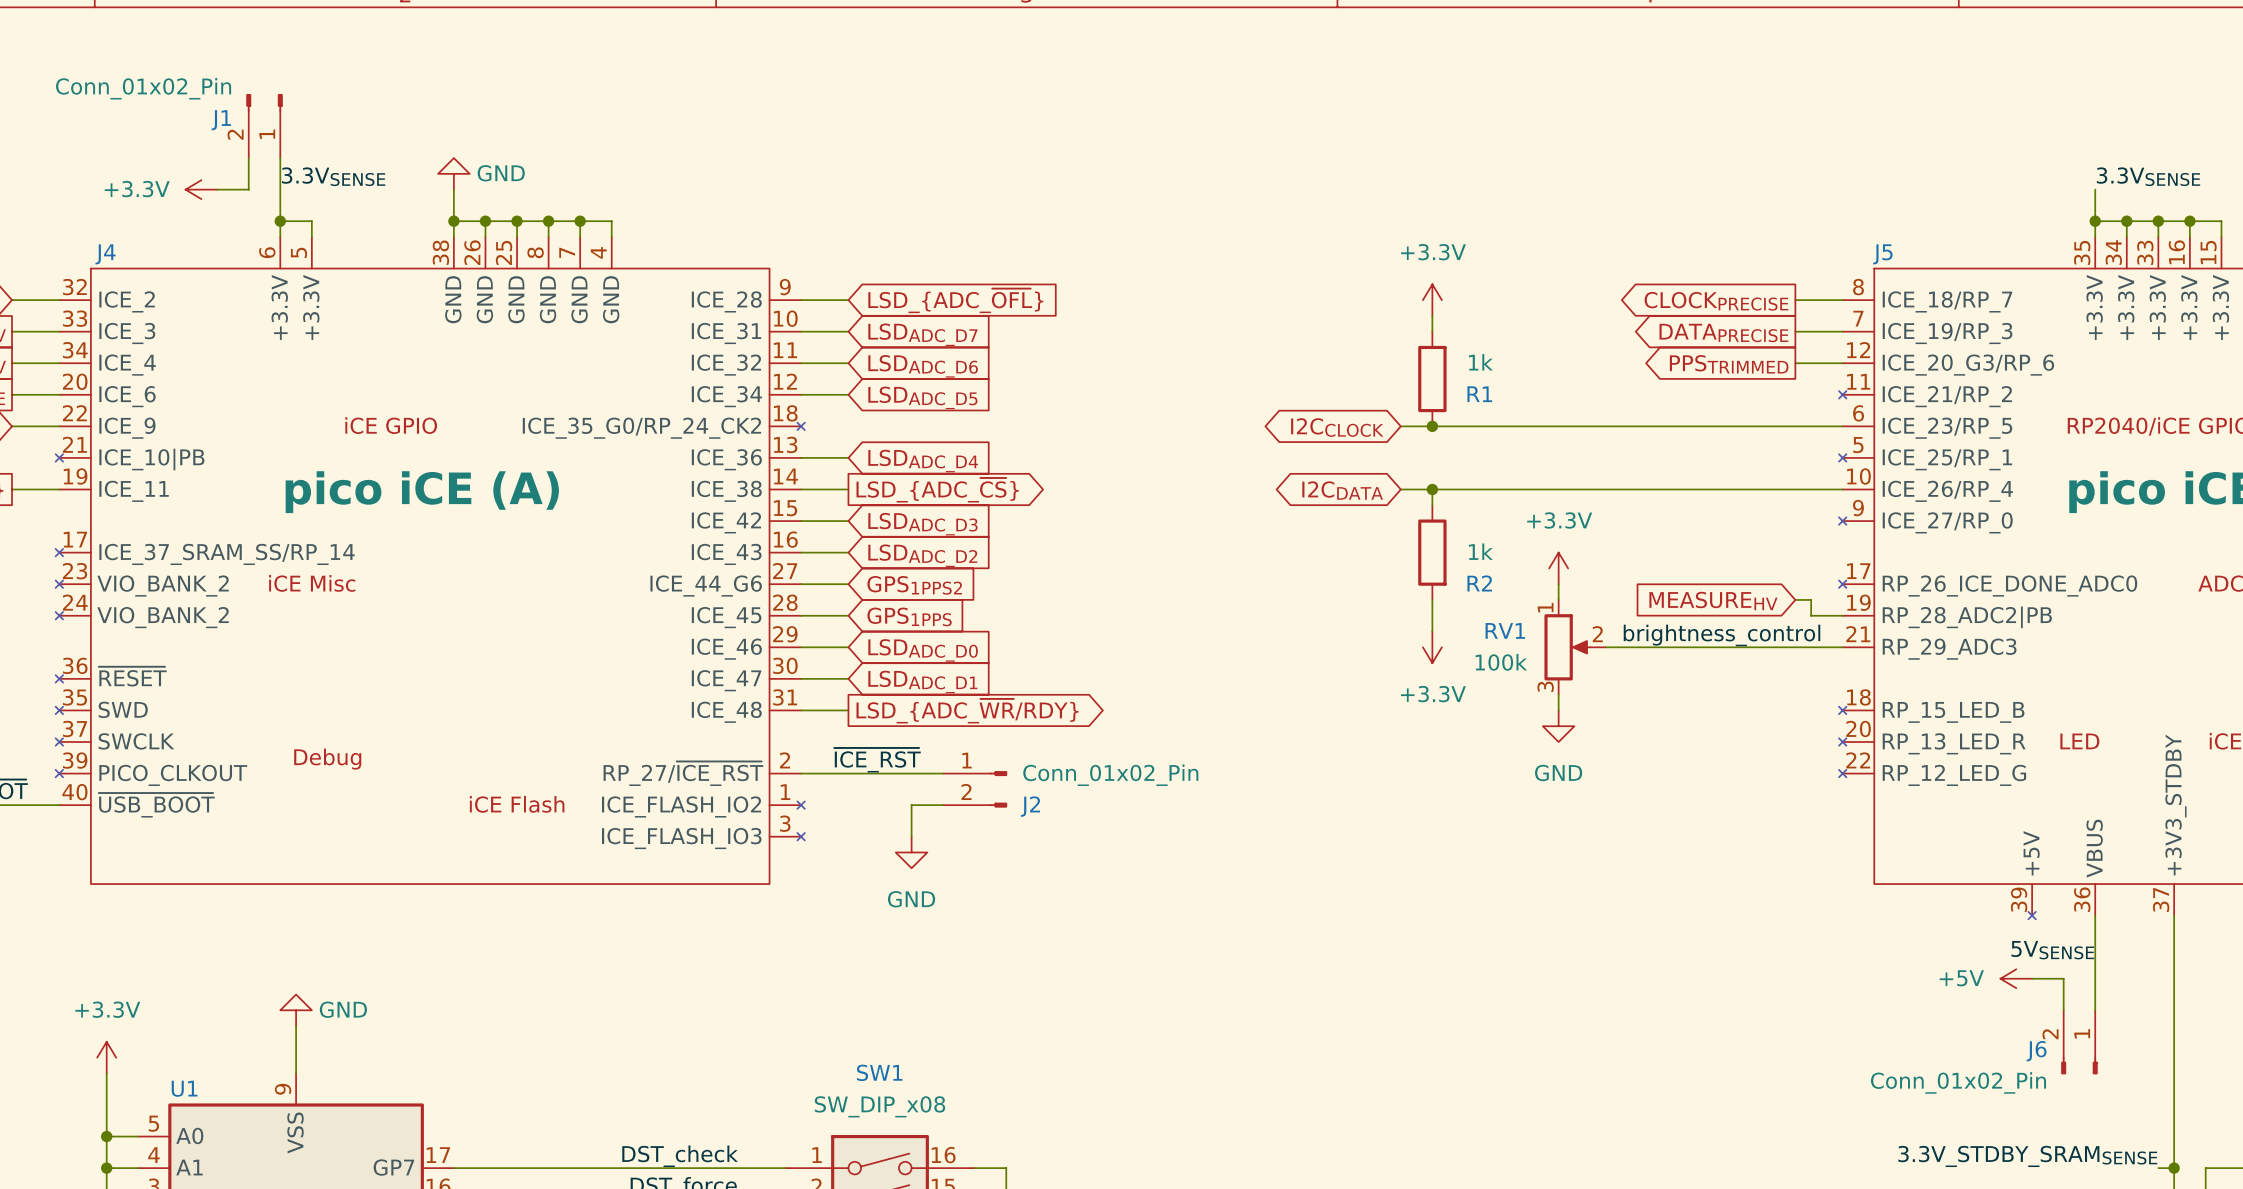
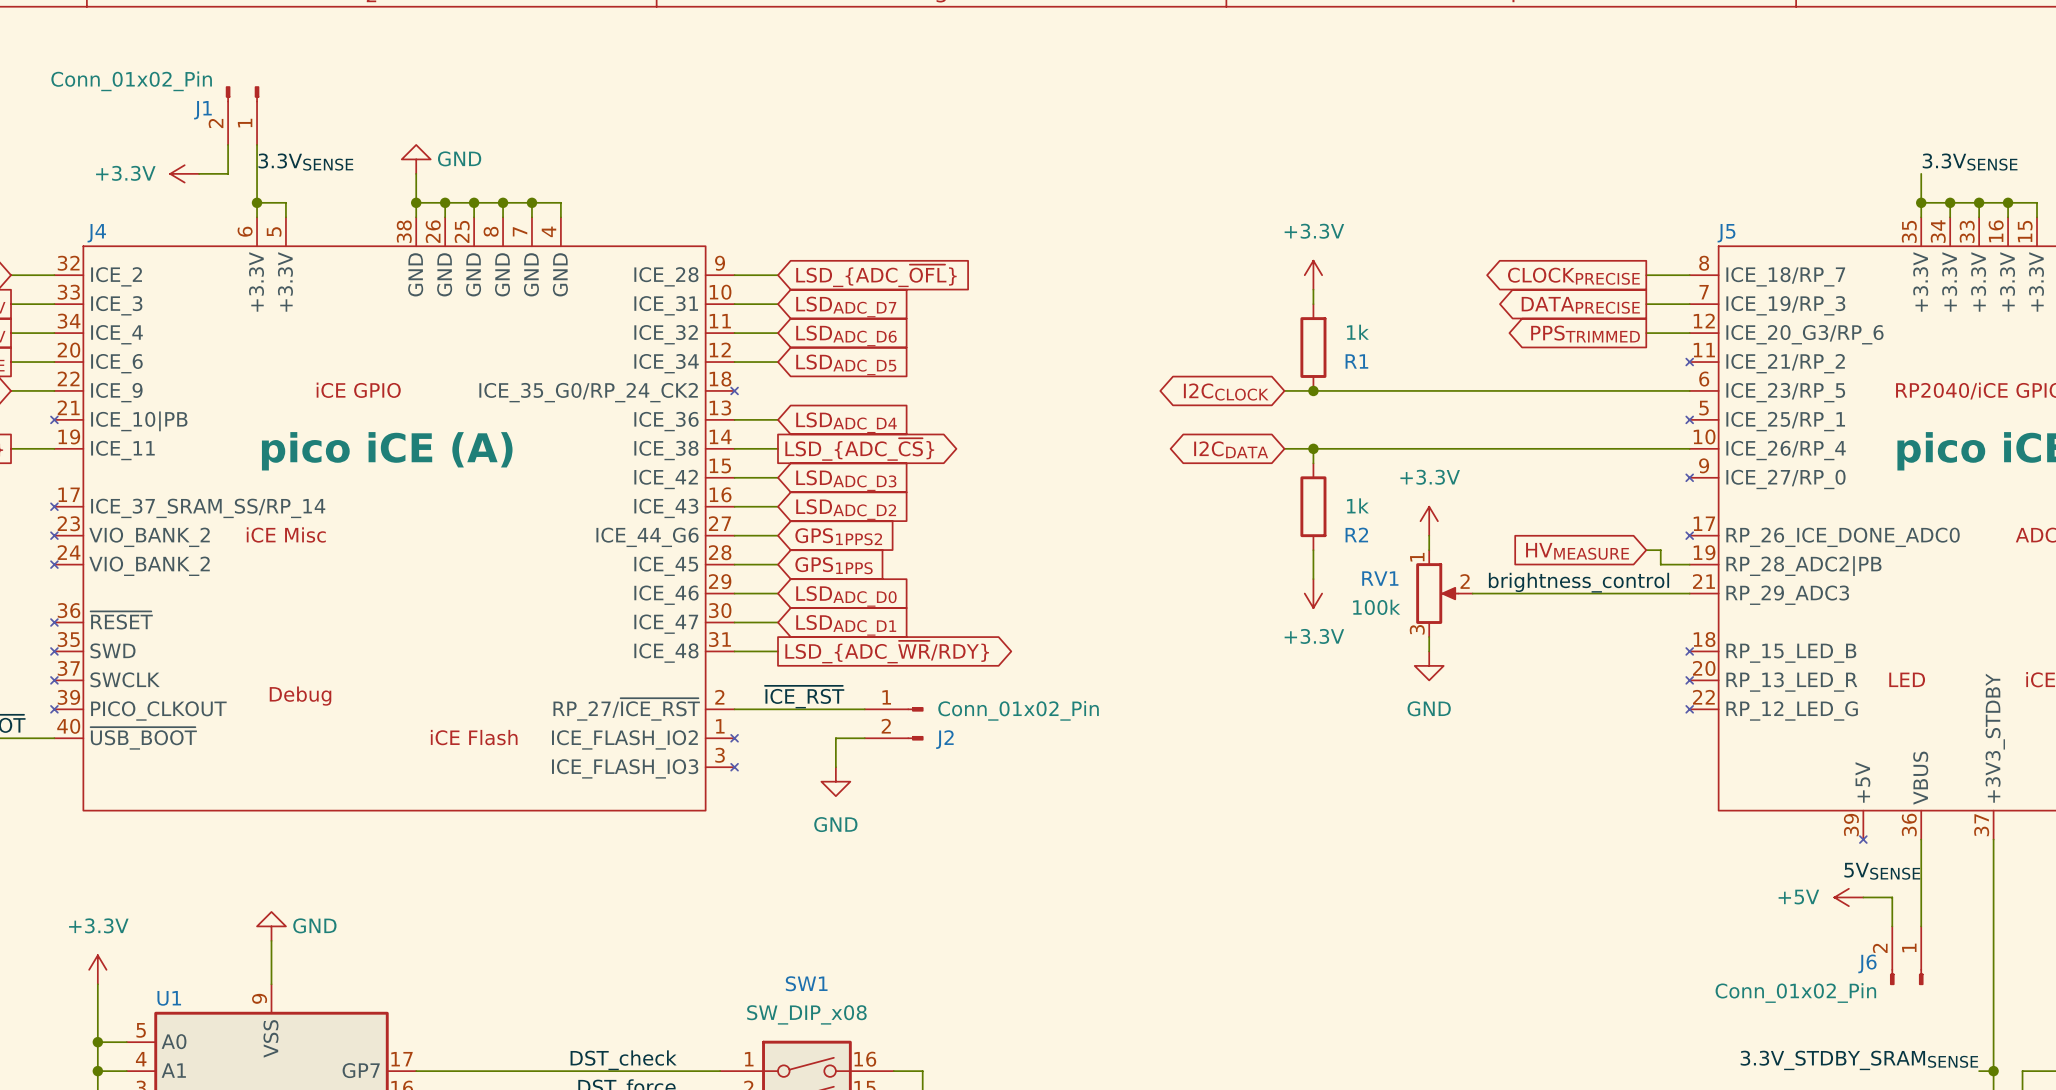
global label: MEASUREHV (1713, 601) -> HVMEASURE (1577, 551)

